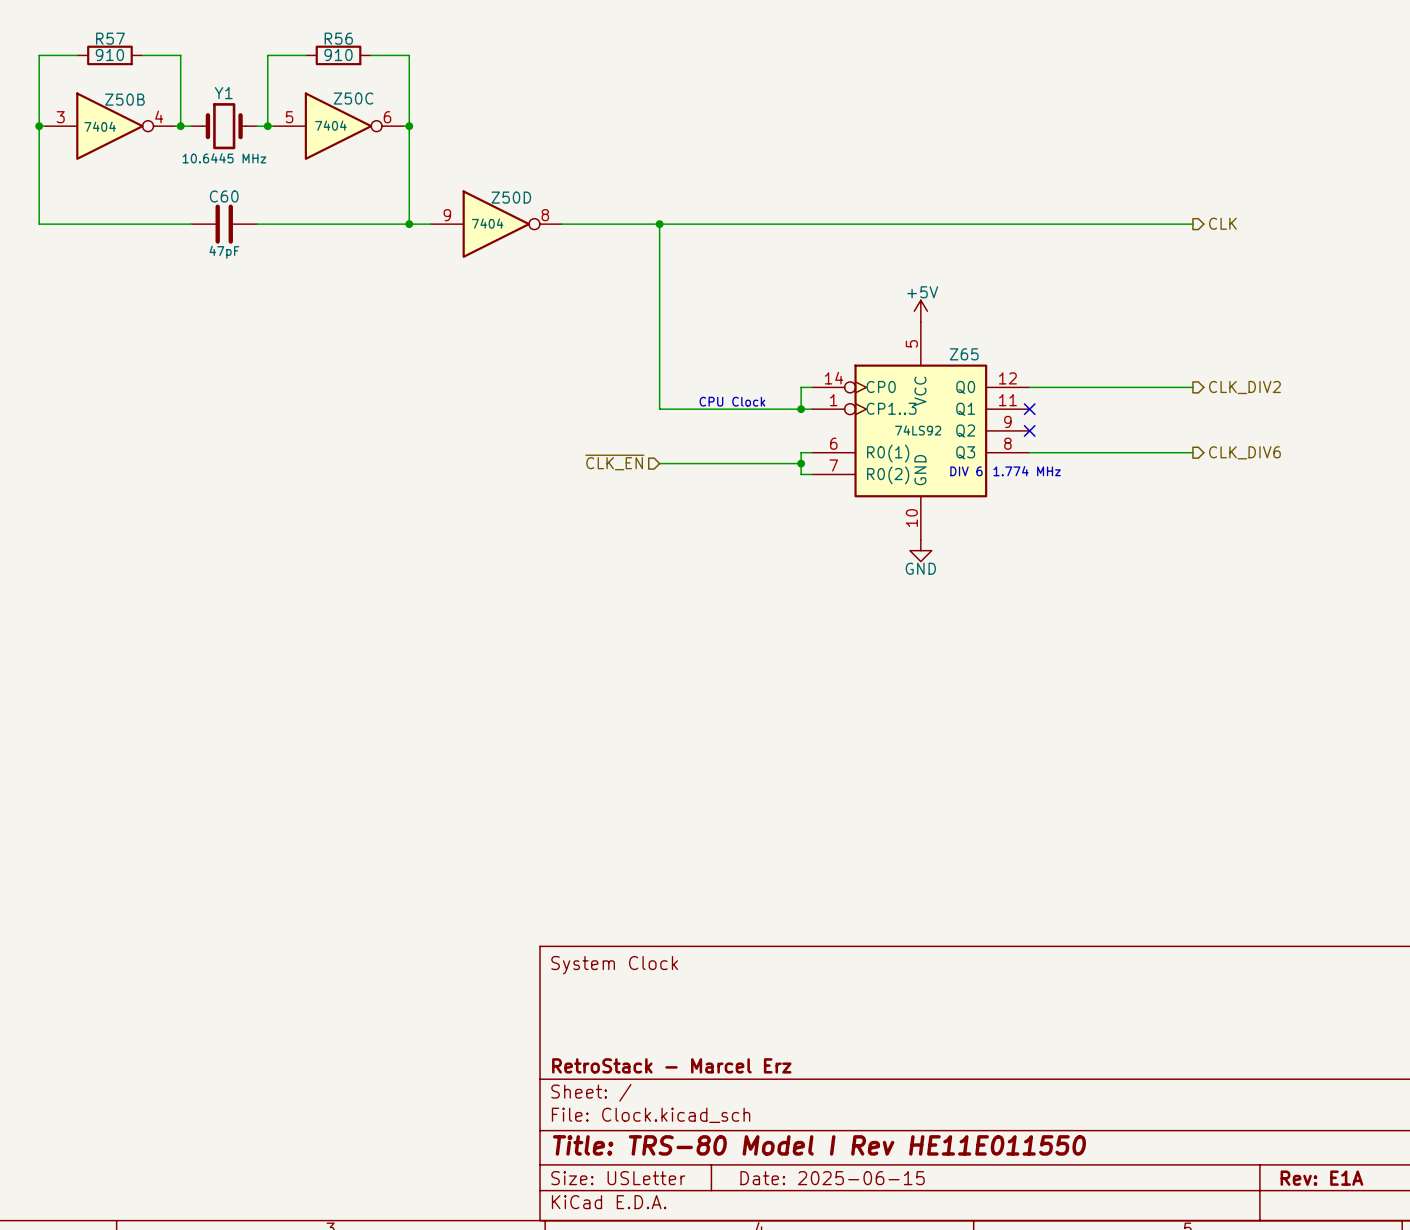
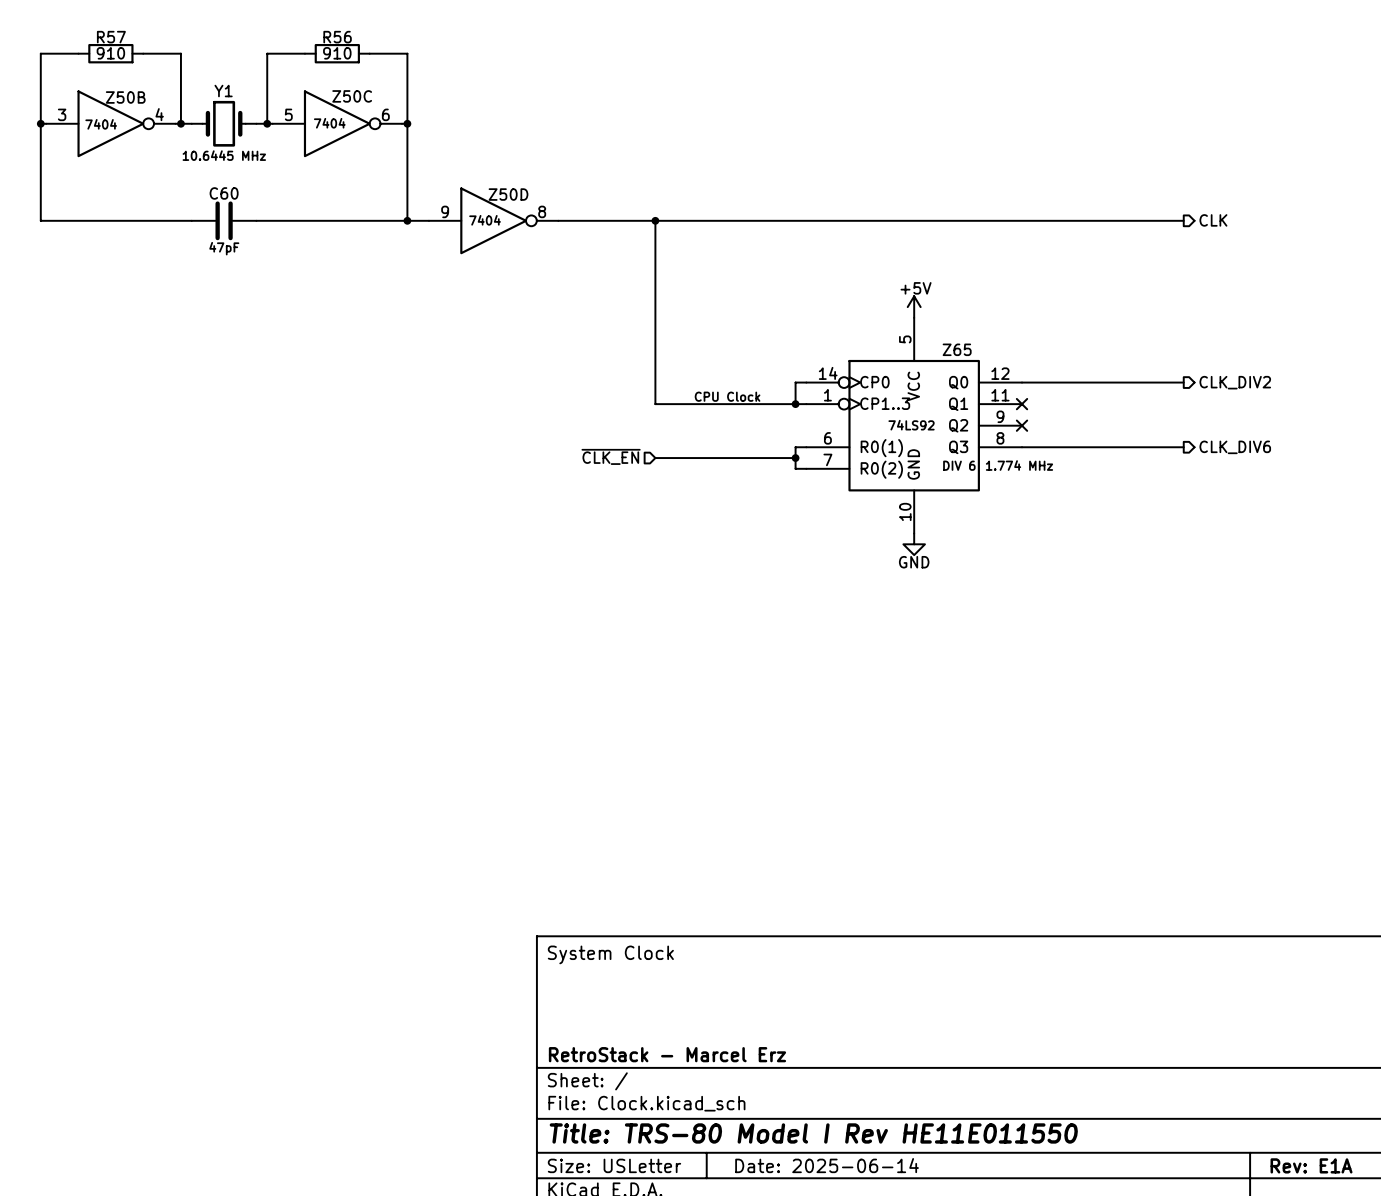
title block: Date: 2025-06-15 (832, 1178) -> Date: 2025-06-14 (827, 1165)

